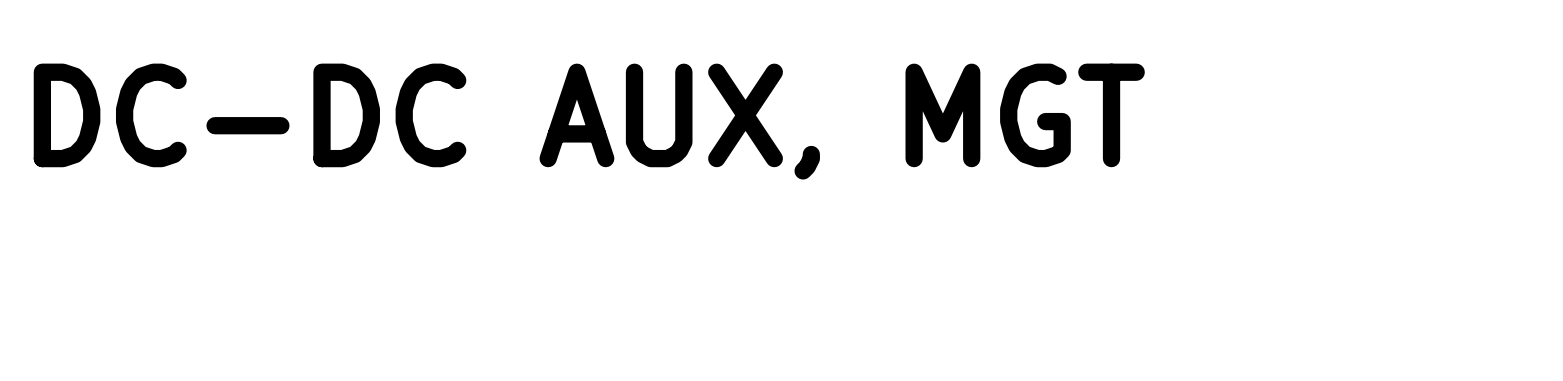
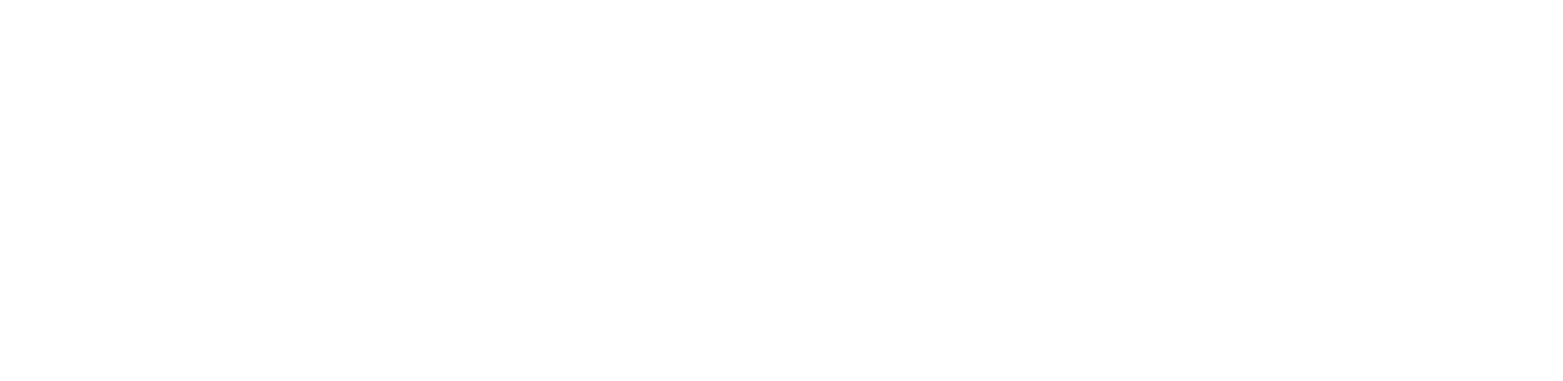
text: DC-DC AUX, MGT (589, 121) -> none

